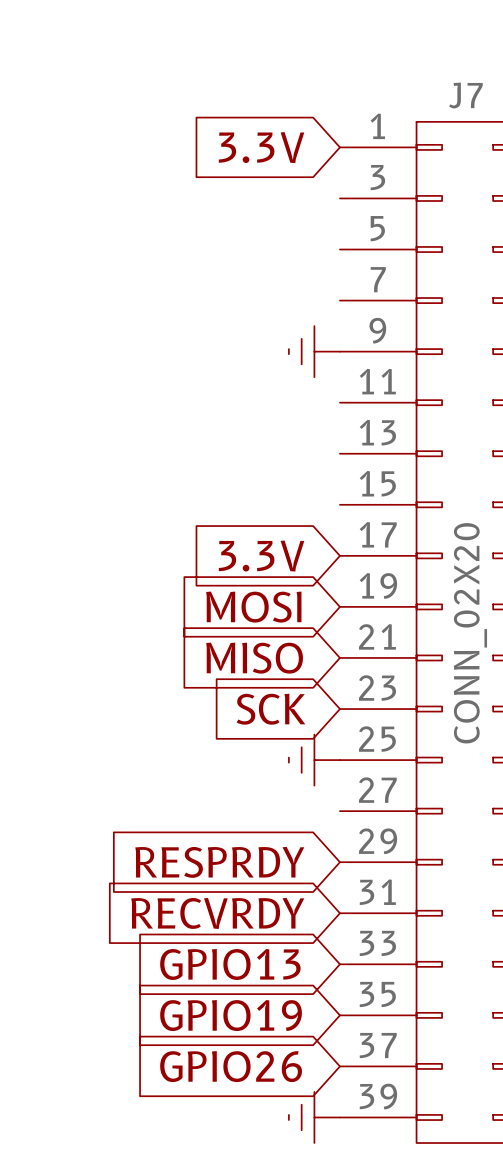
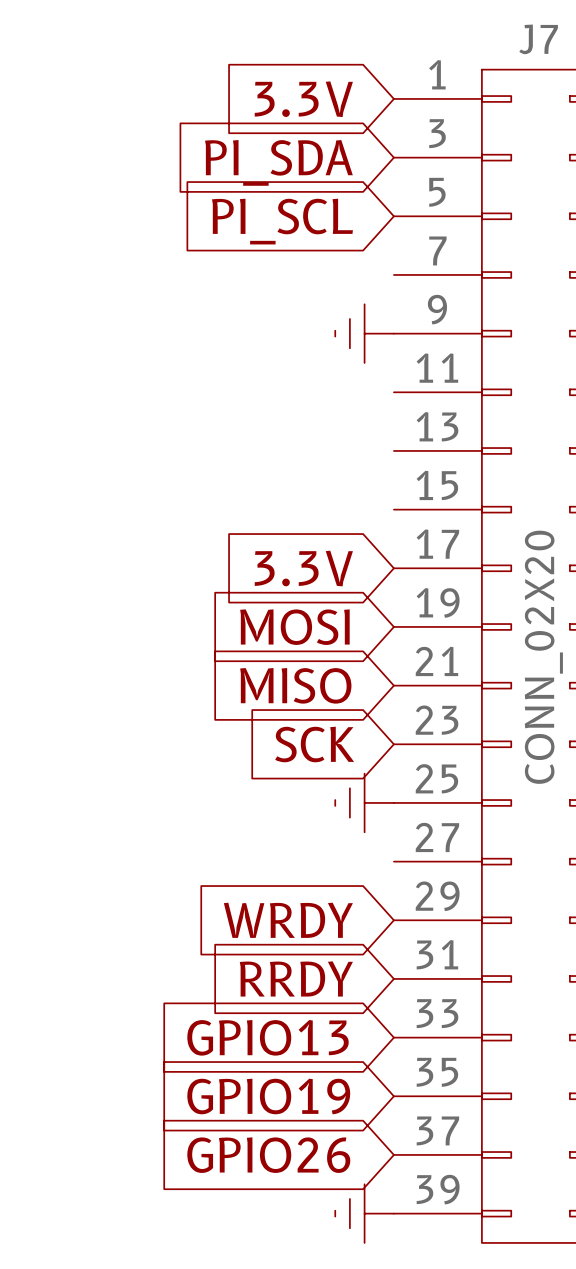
global label: none -> PI_SDA (278, 162)
global label: none -> PI_SCL (282, 221)
global label: RESPRDY (219, 862) -> WRDY (288, 920)
global label: RECVRDY (217, 913) -> RRDY (296, 978)

